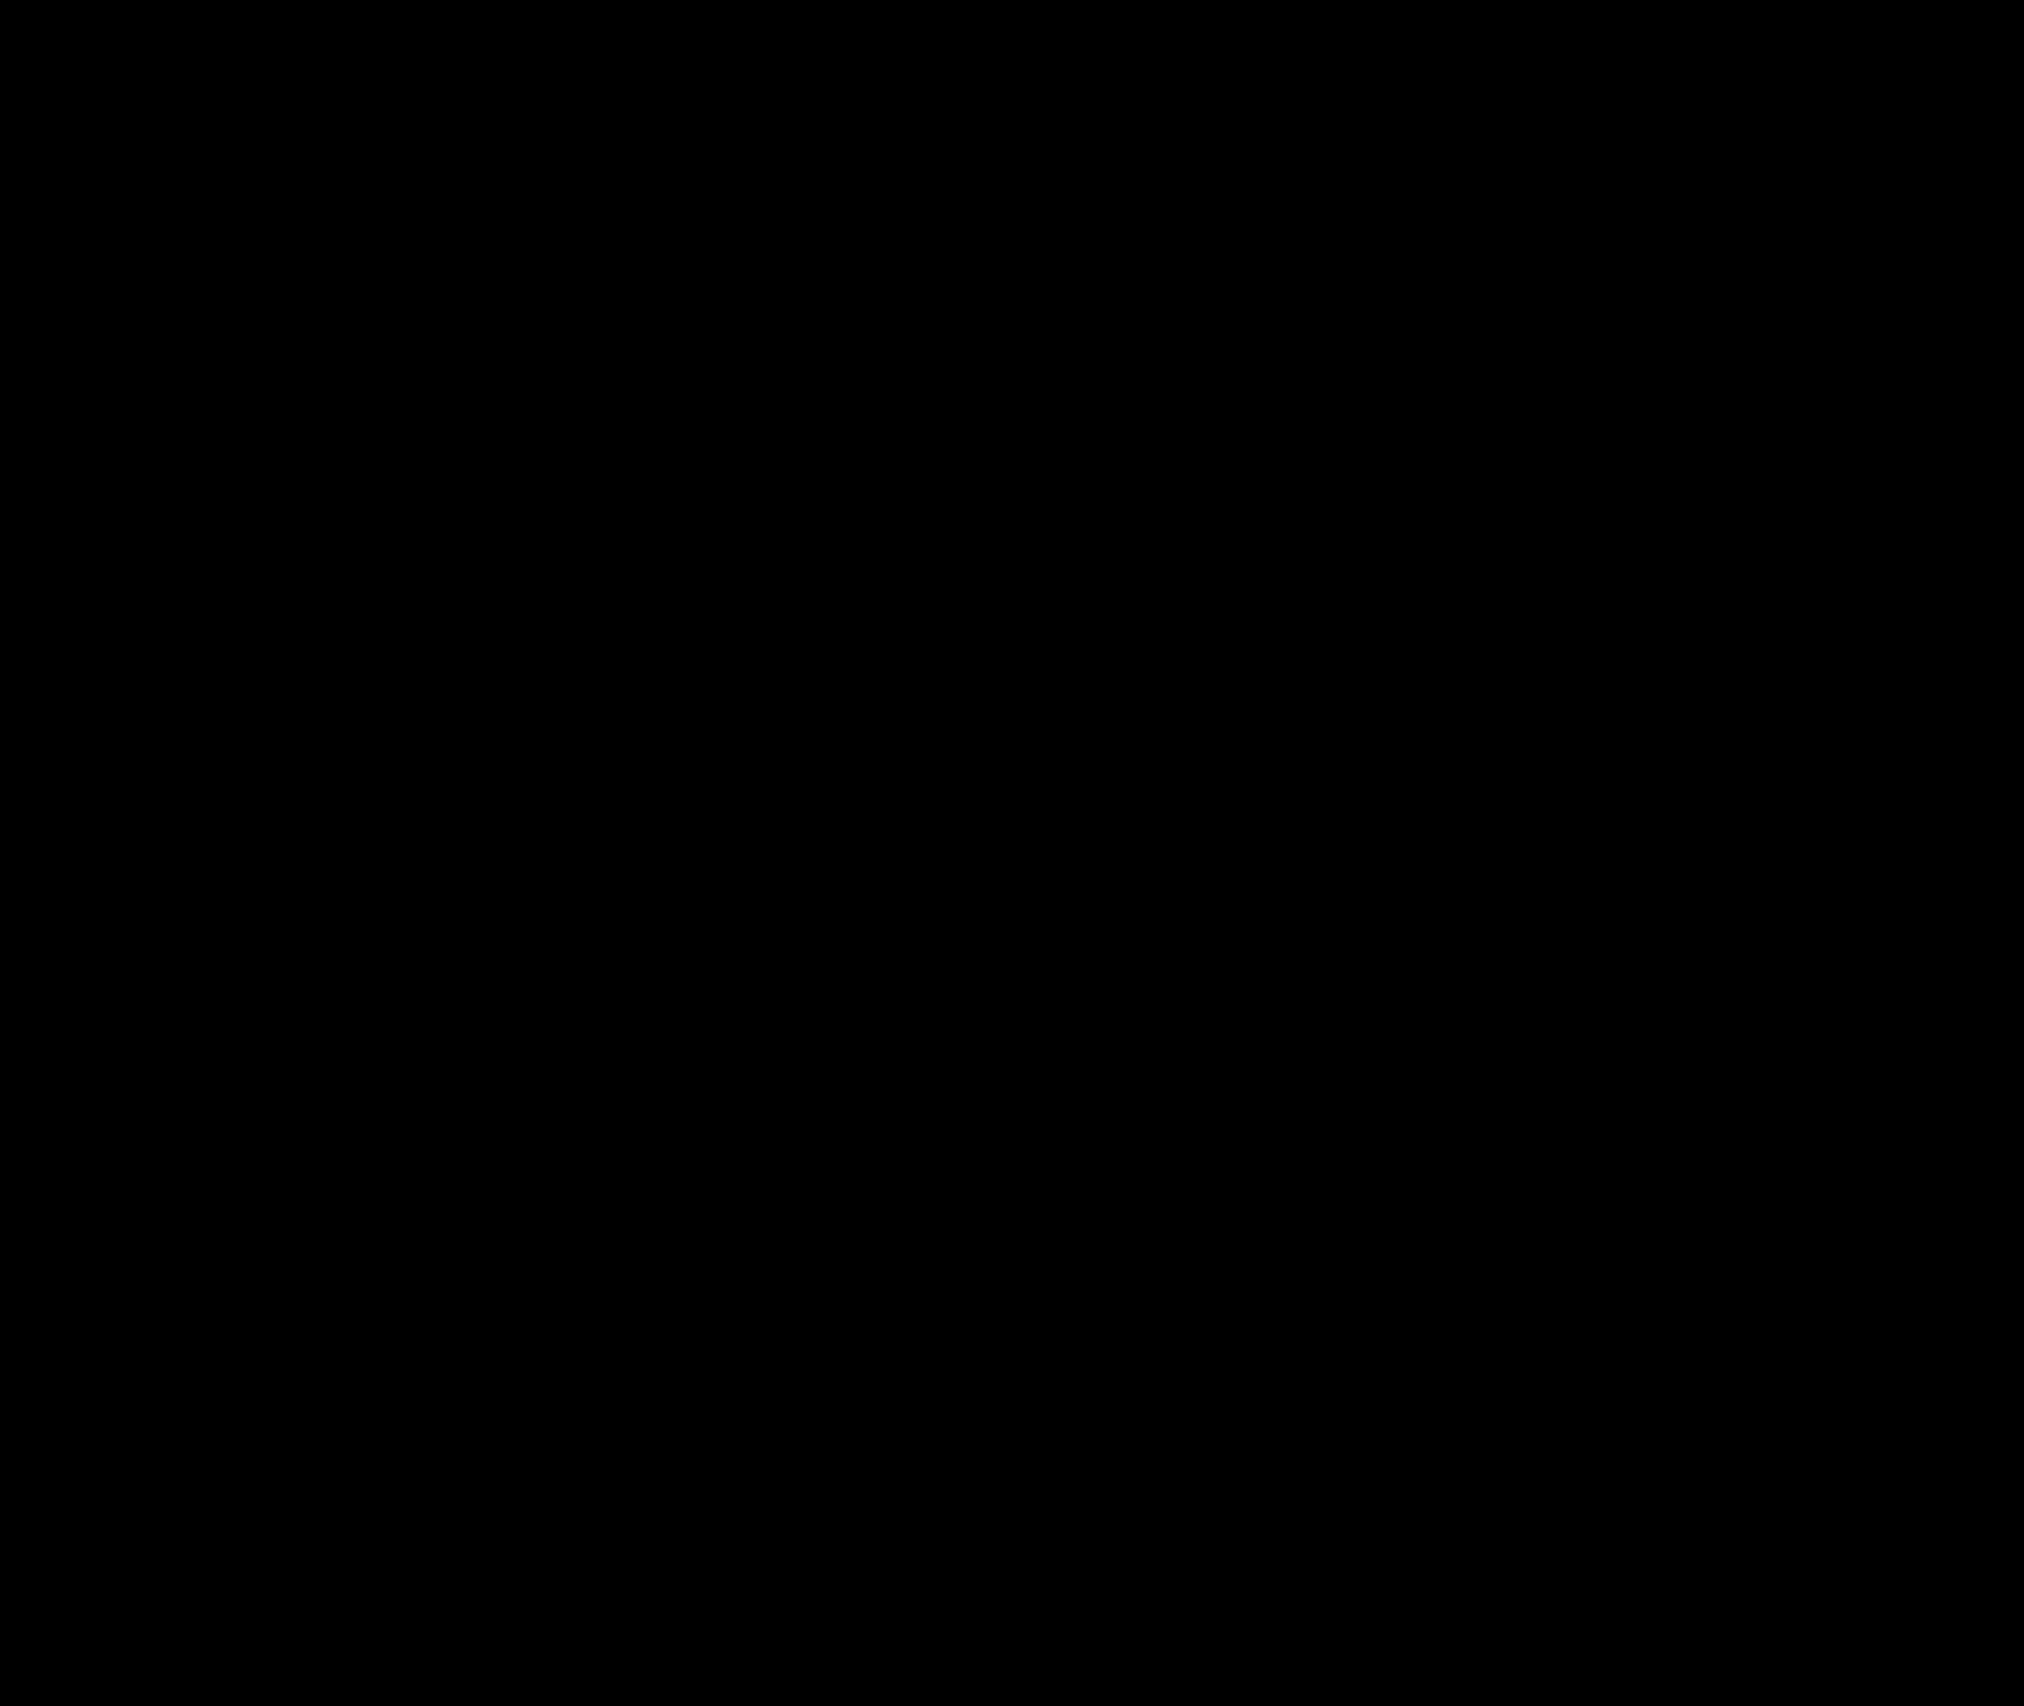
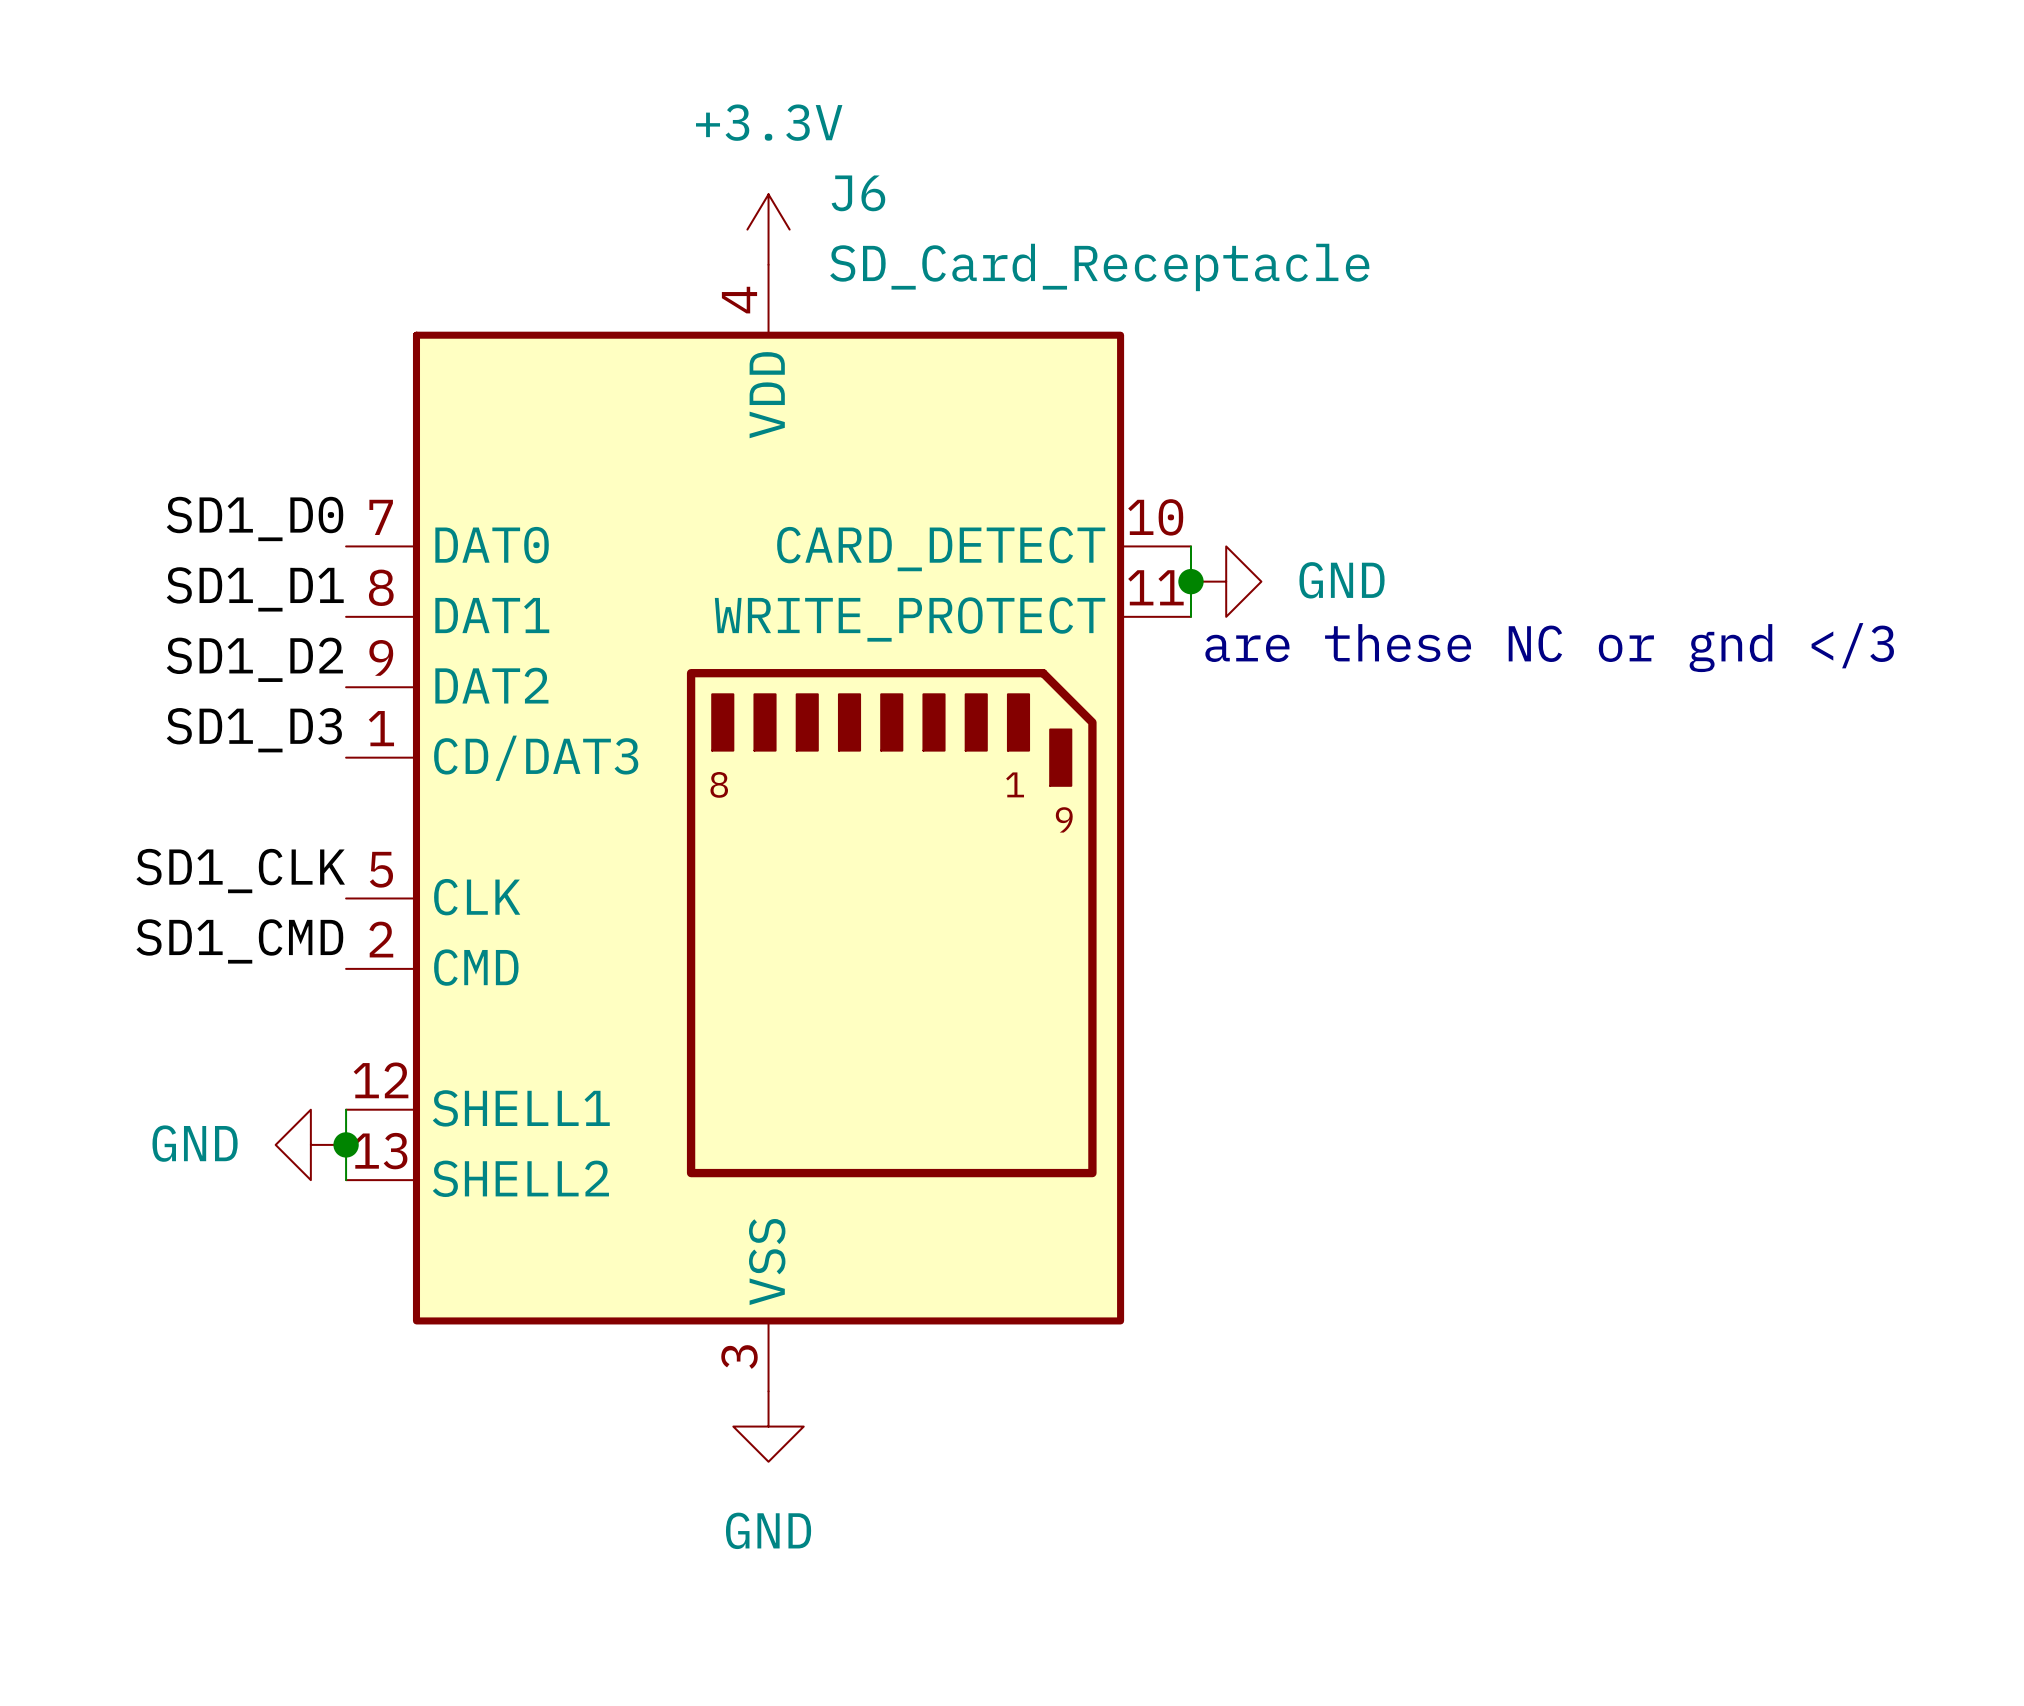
power symbol: none -> +3.3V (768, 229)
label: none -> SD1_D0 (255, 518)
wire: none -> (1190, 546) (1190, 616)
junction: none -> (1190, 581)
power symbol: none -> GND (1226, 581)
label: none -> SD1_D1 (255, 589)
text: none -> are these NC or gnd </3 (1549, 647)
label: none -> SD1_D2 (254, 659)
label: none -> SD1_D3 (254, 730)
J6: none -> SD_Card_Receptacle (768, 828)
label: none -> SD1_CLK (240, 871)
label: none -> SD1_CMD (239, 941)
wire: none -> (346, 1109) (346, 1180)
power symbol: none -> GND (310, 1144)
junction: none -> (346, 1144)
power symbol: none -> GND (768, 1426)

